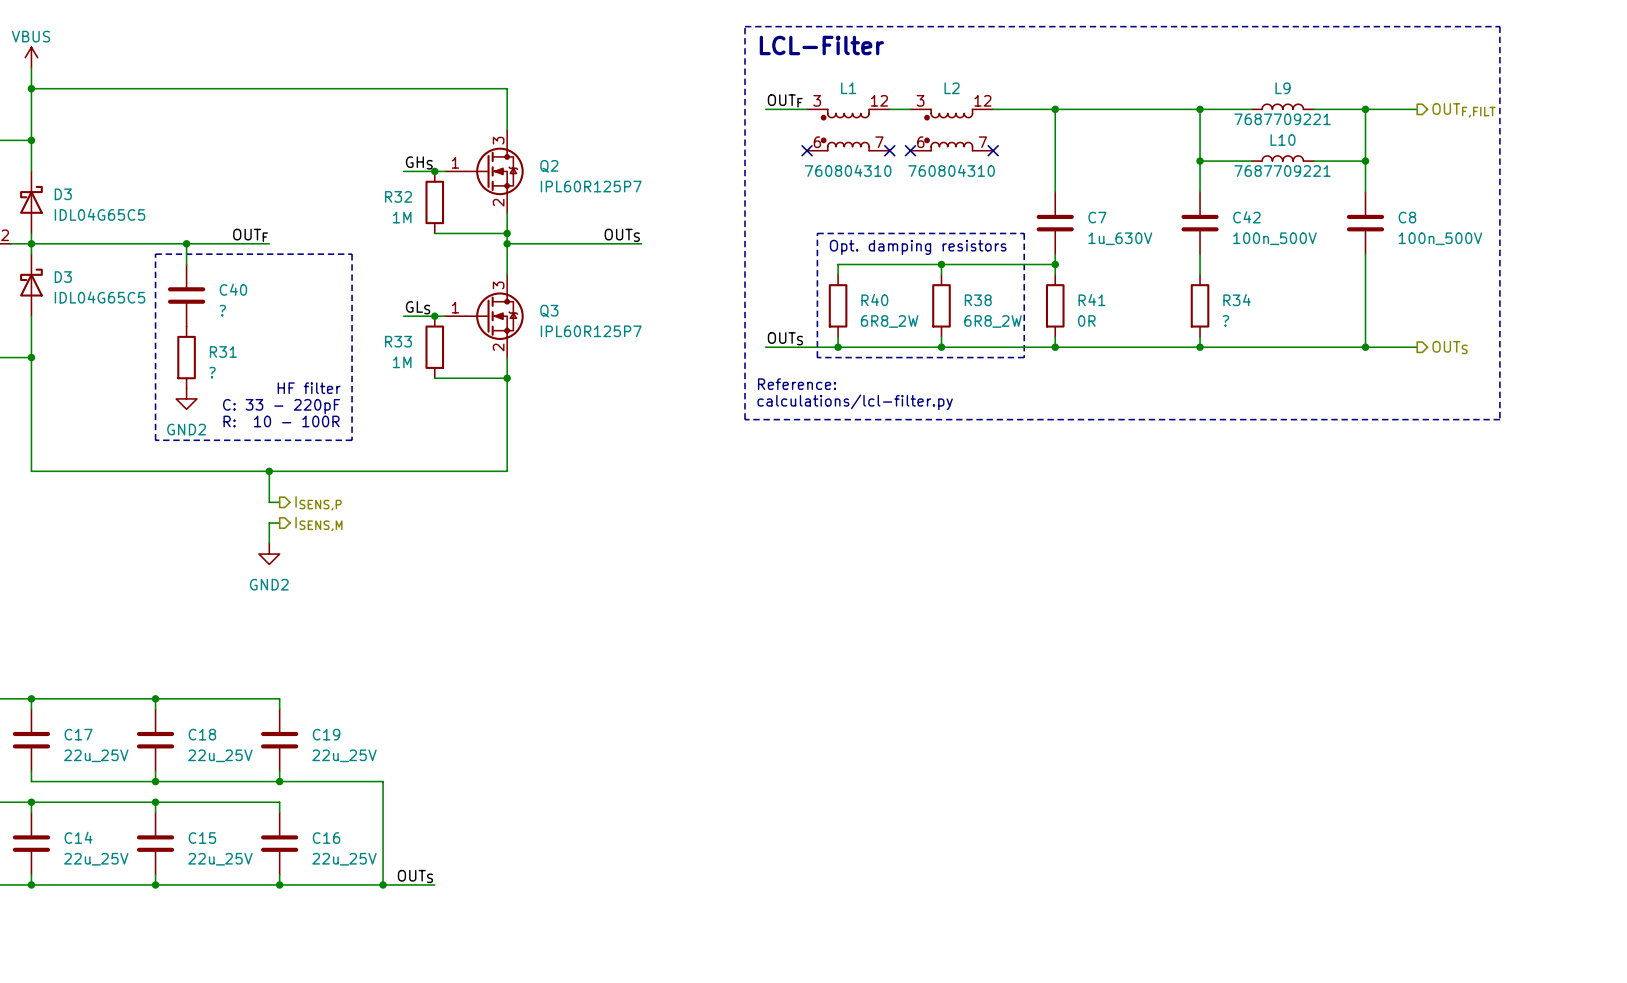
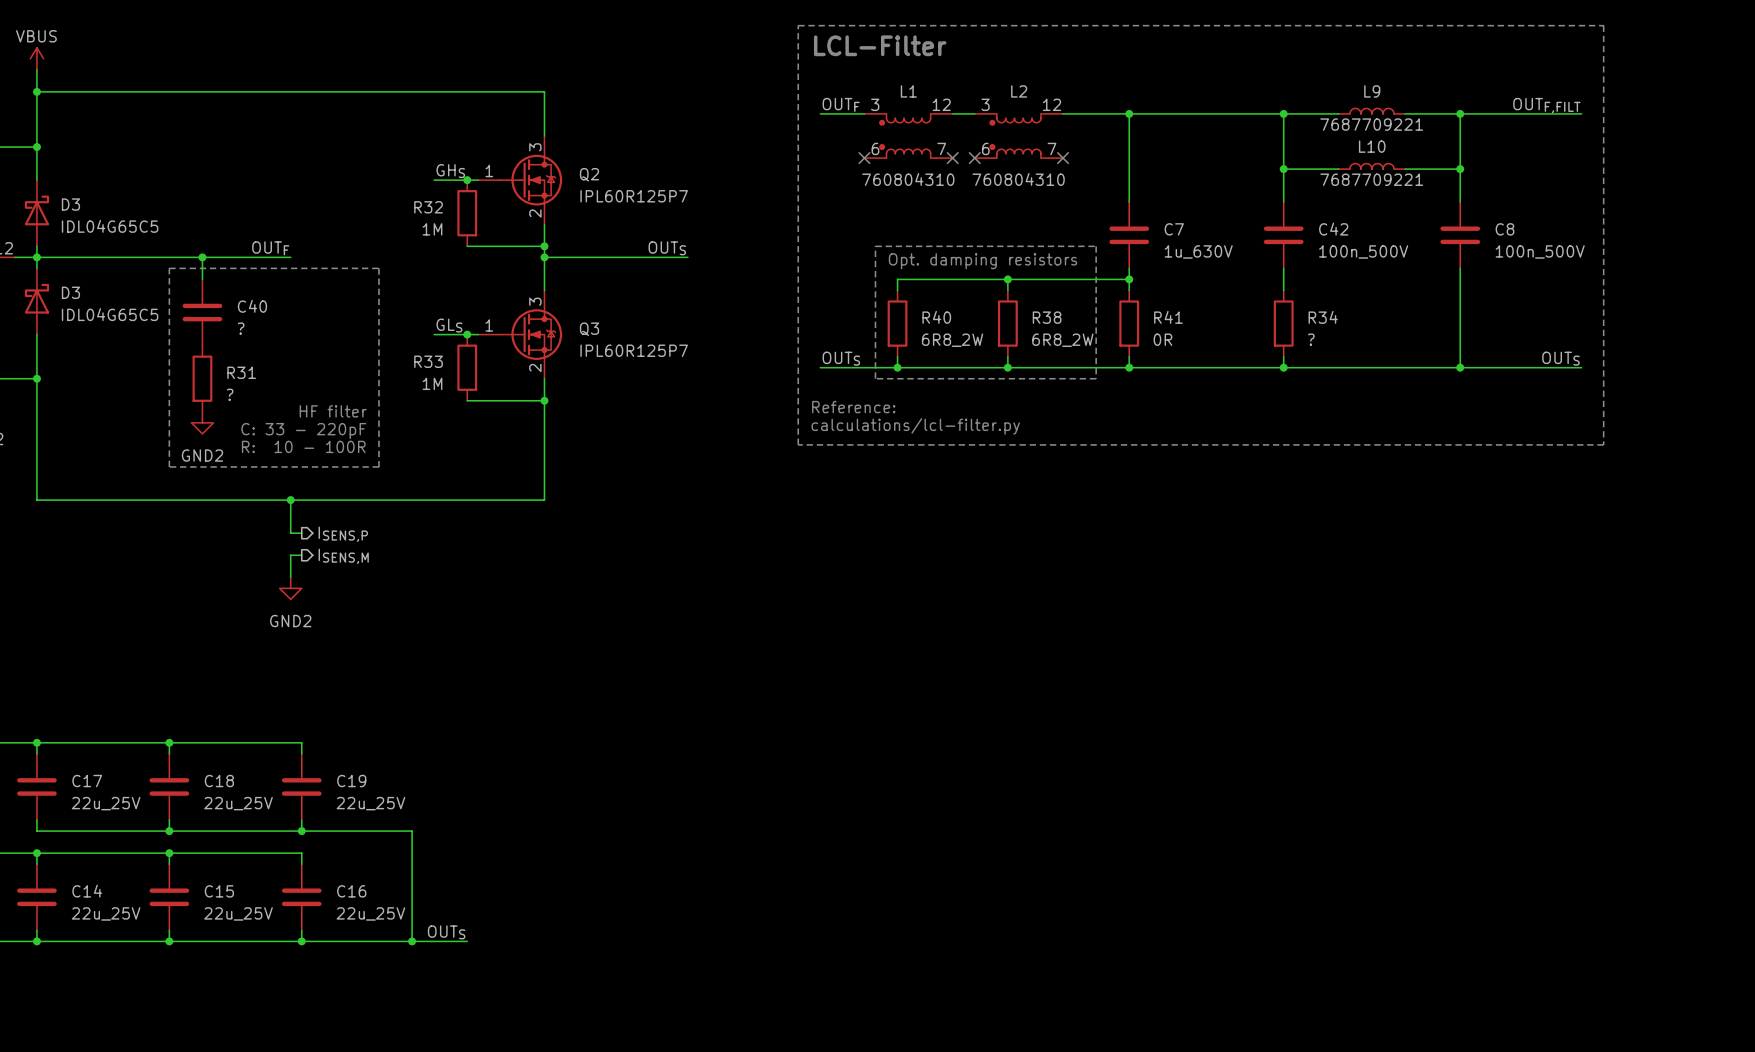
label: none -> OUTF,FILT (1546, 105)
wire: none -> (1515, 113) (1581, 113)
hierarchical label: OUTF,FILT (1464, 110) -> none
label: none -> OUTS (1560, 358)
wire: none -> (1515, 367) (1581, 367)
hierarchical label: OUTS (1450, 347) -> none

